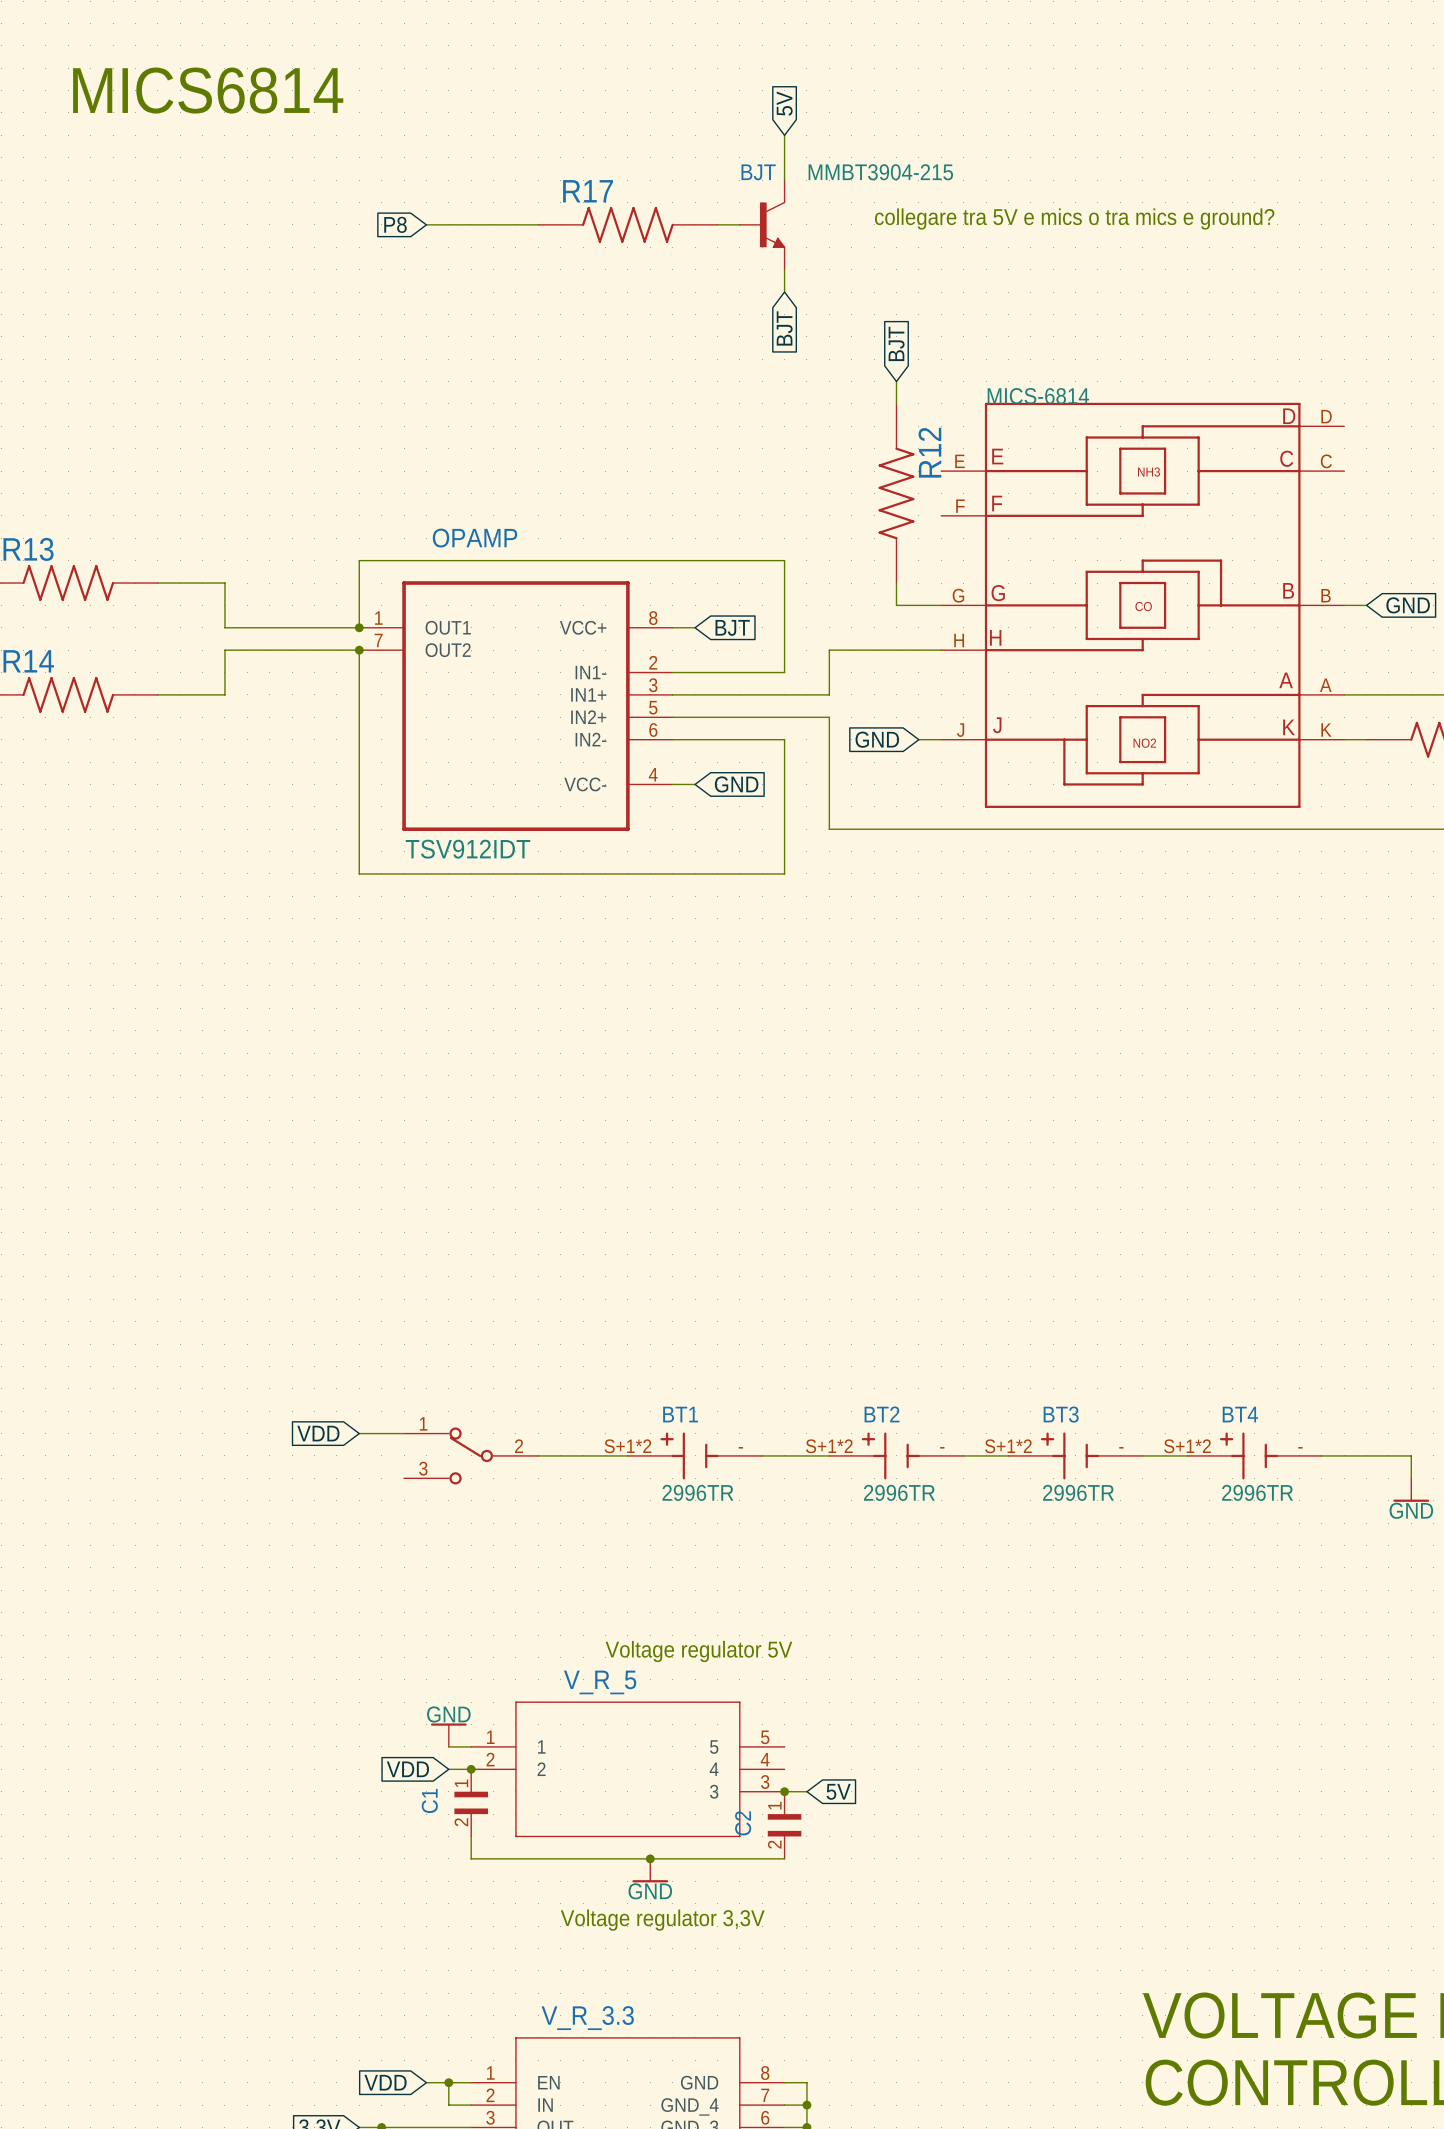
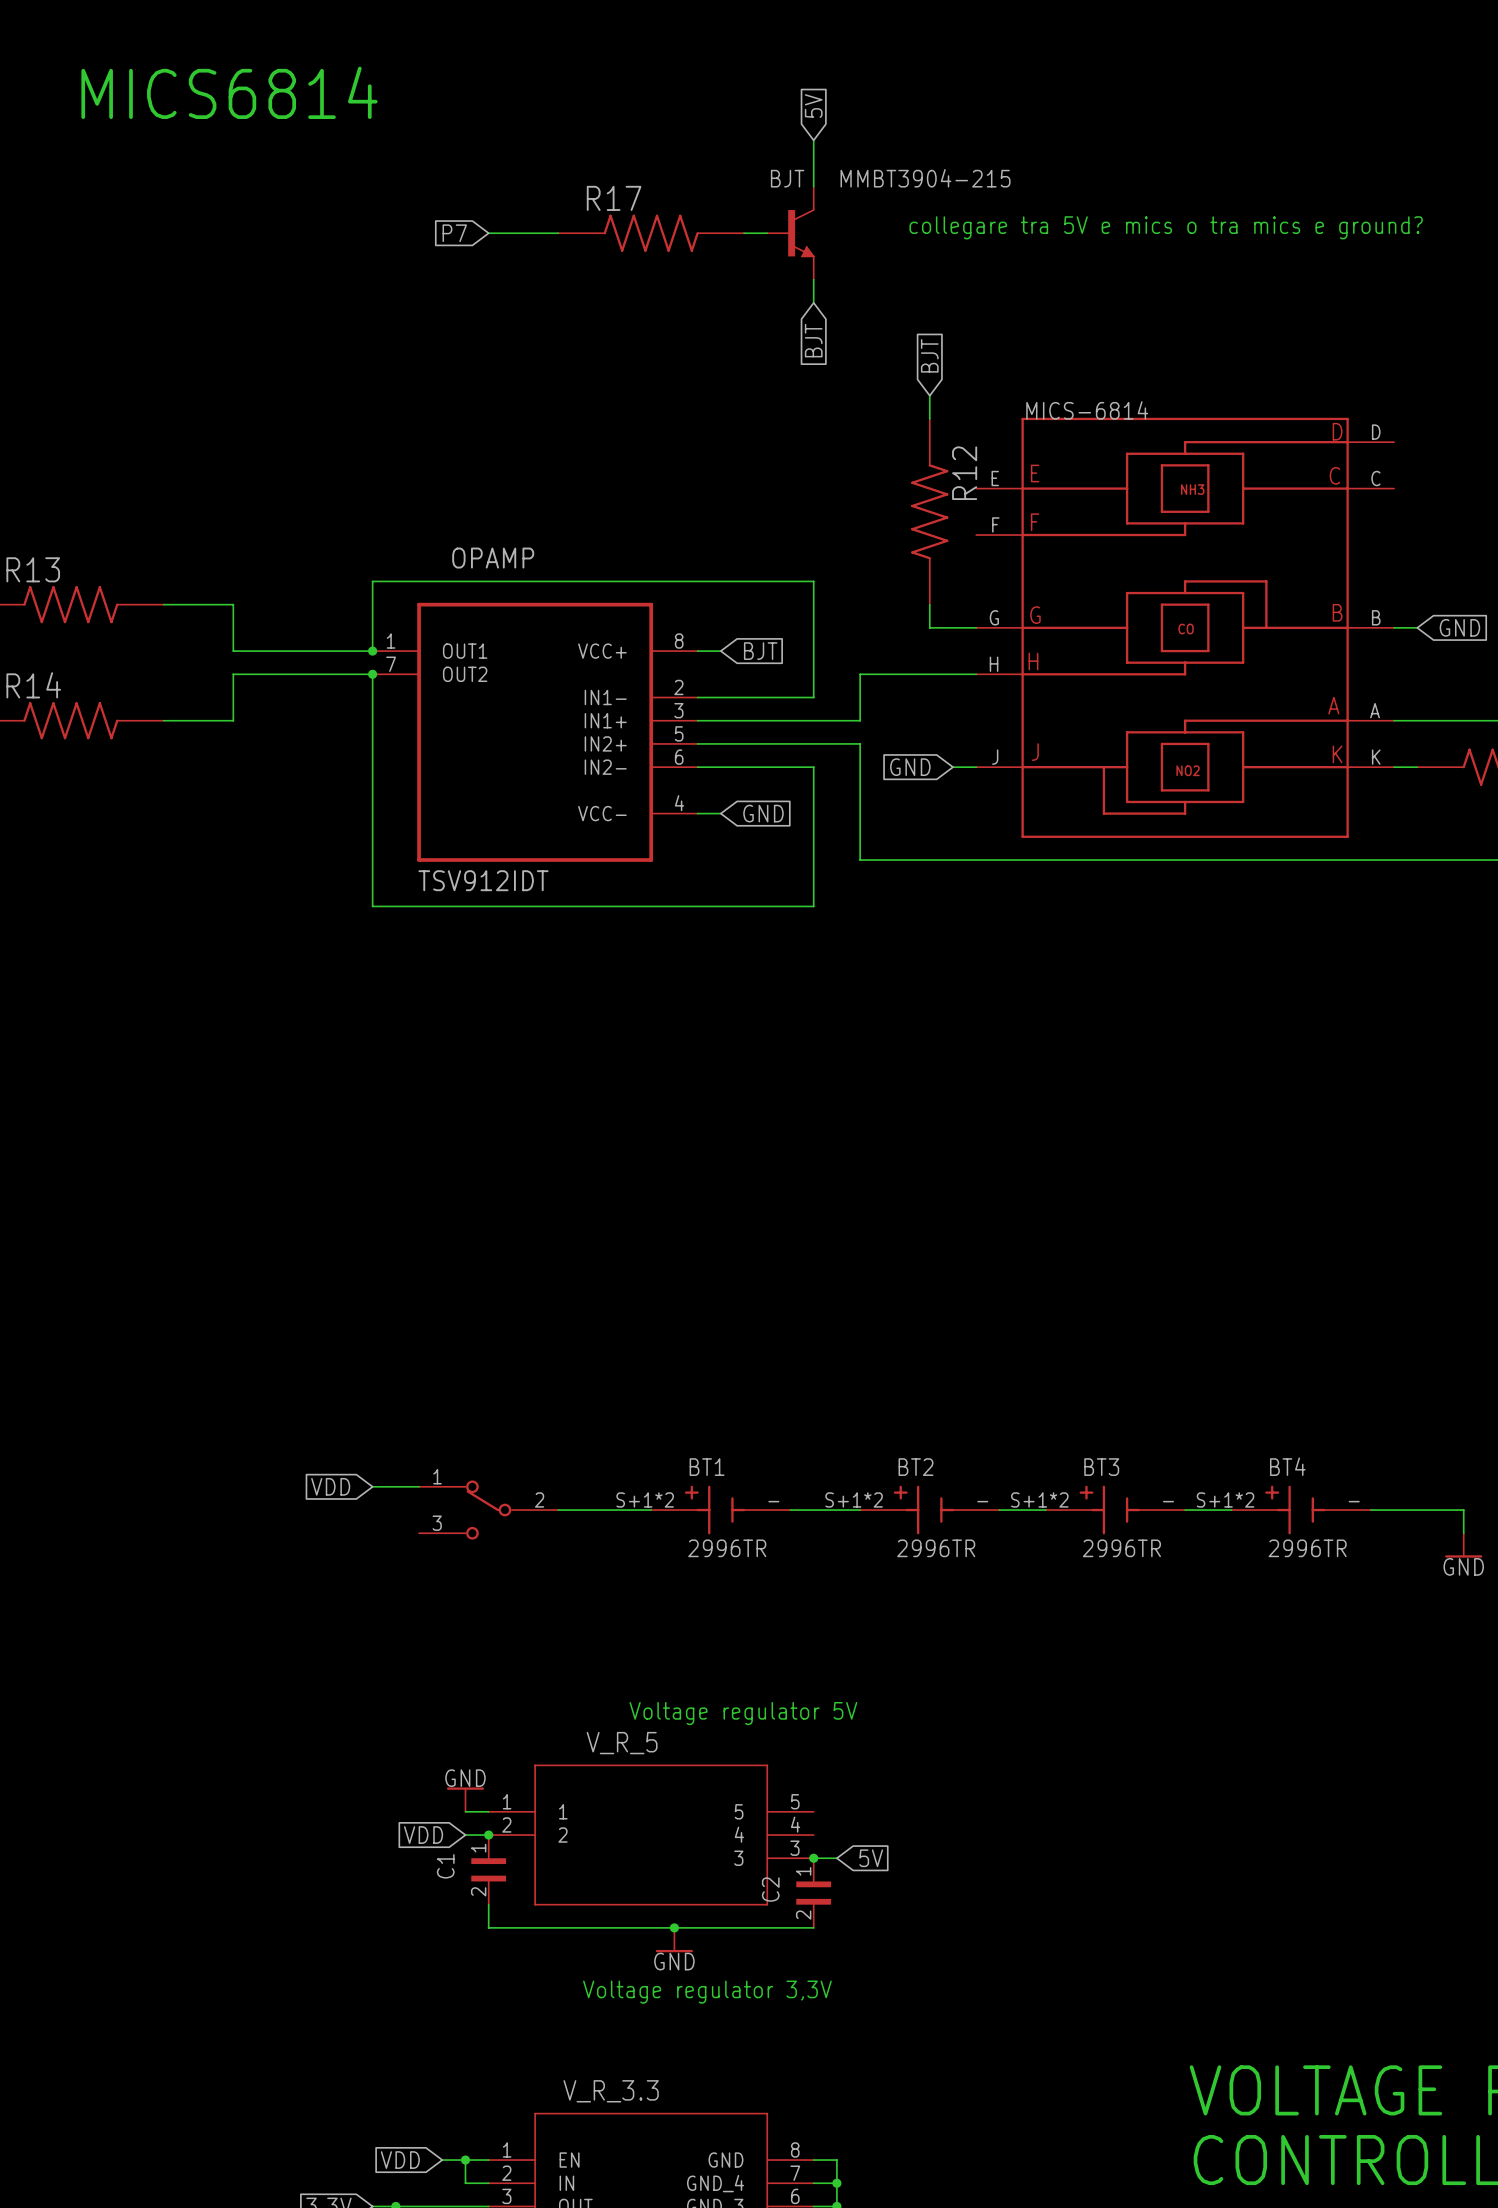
global label: P8 (395, 224) -> none
wire: (426, 224) (471, 224) -> none
global label: none -> P7 (454, 233)

